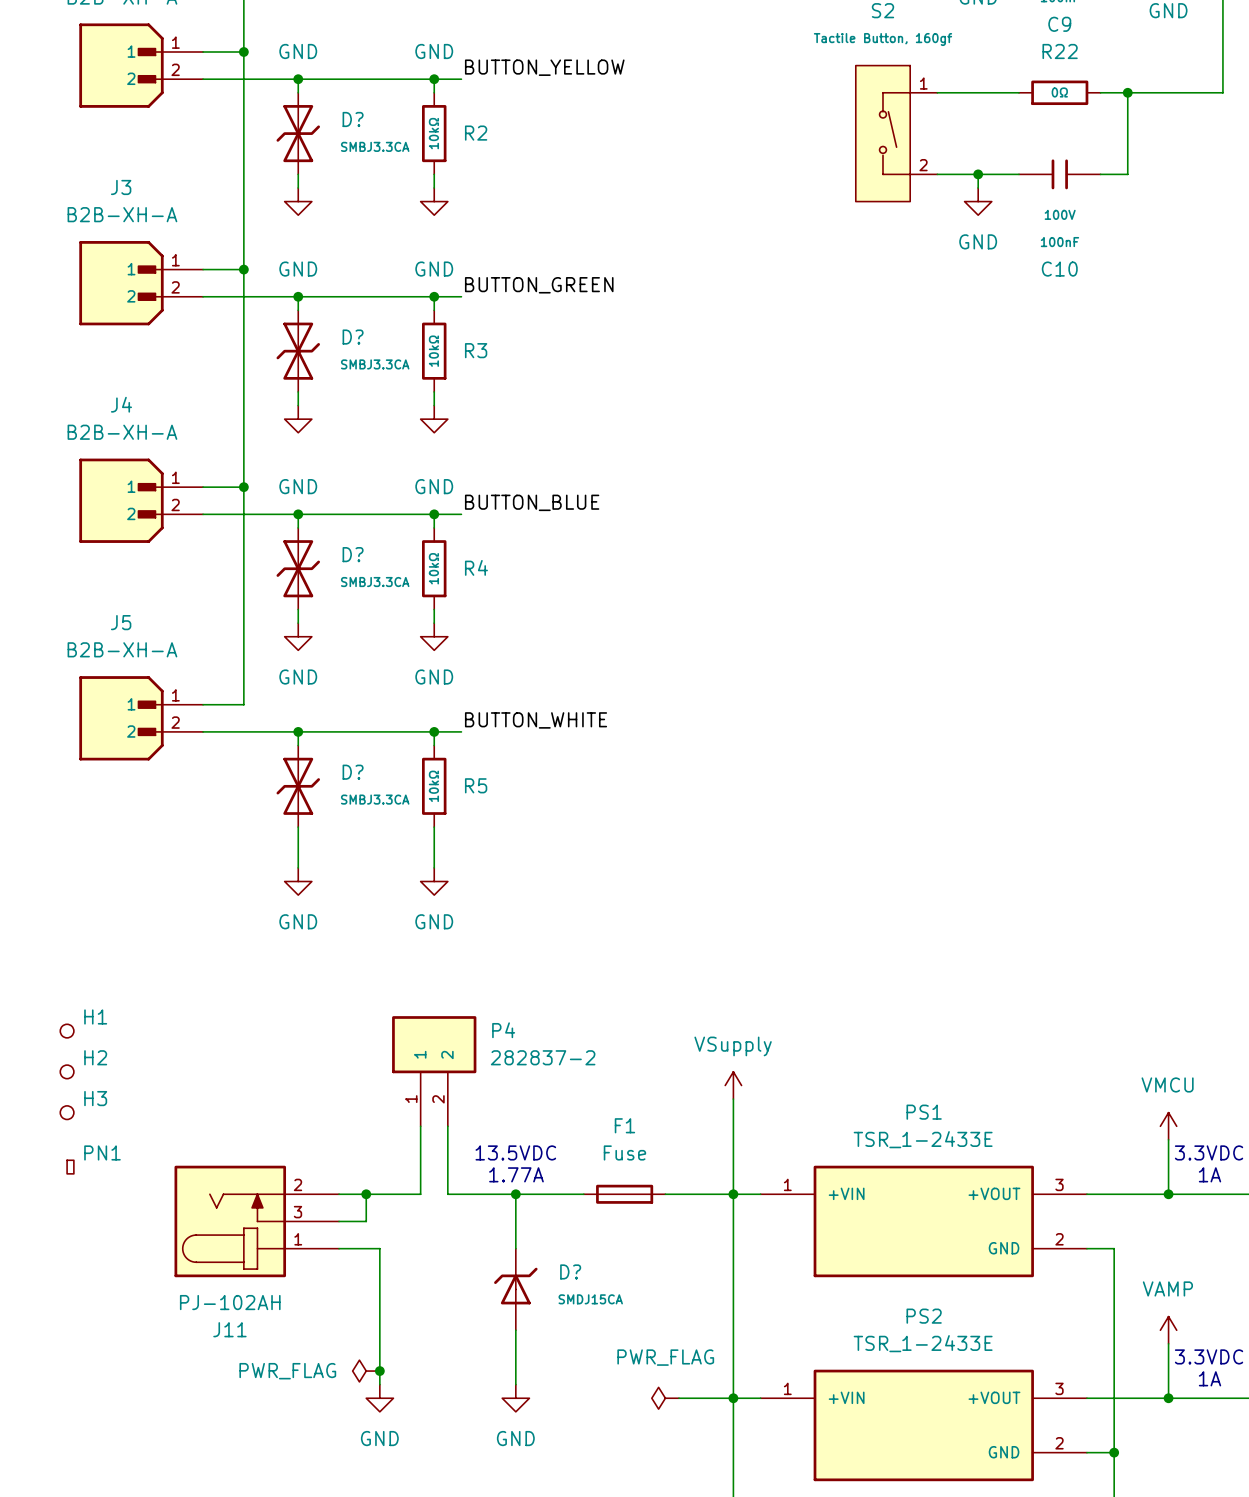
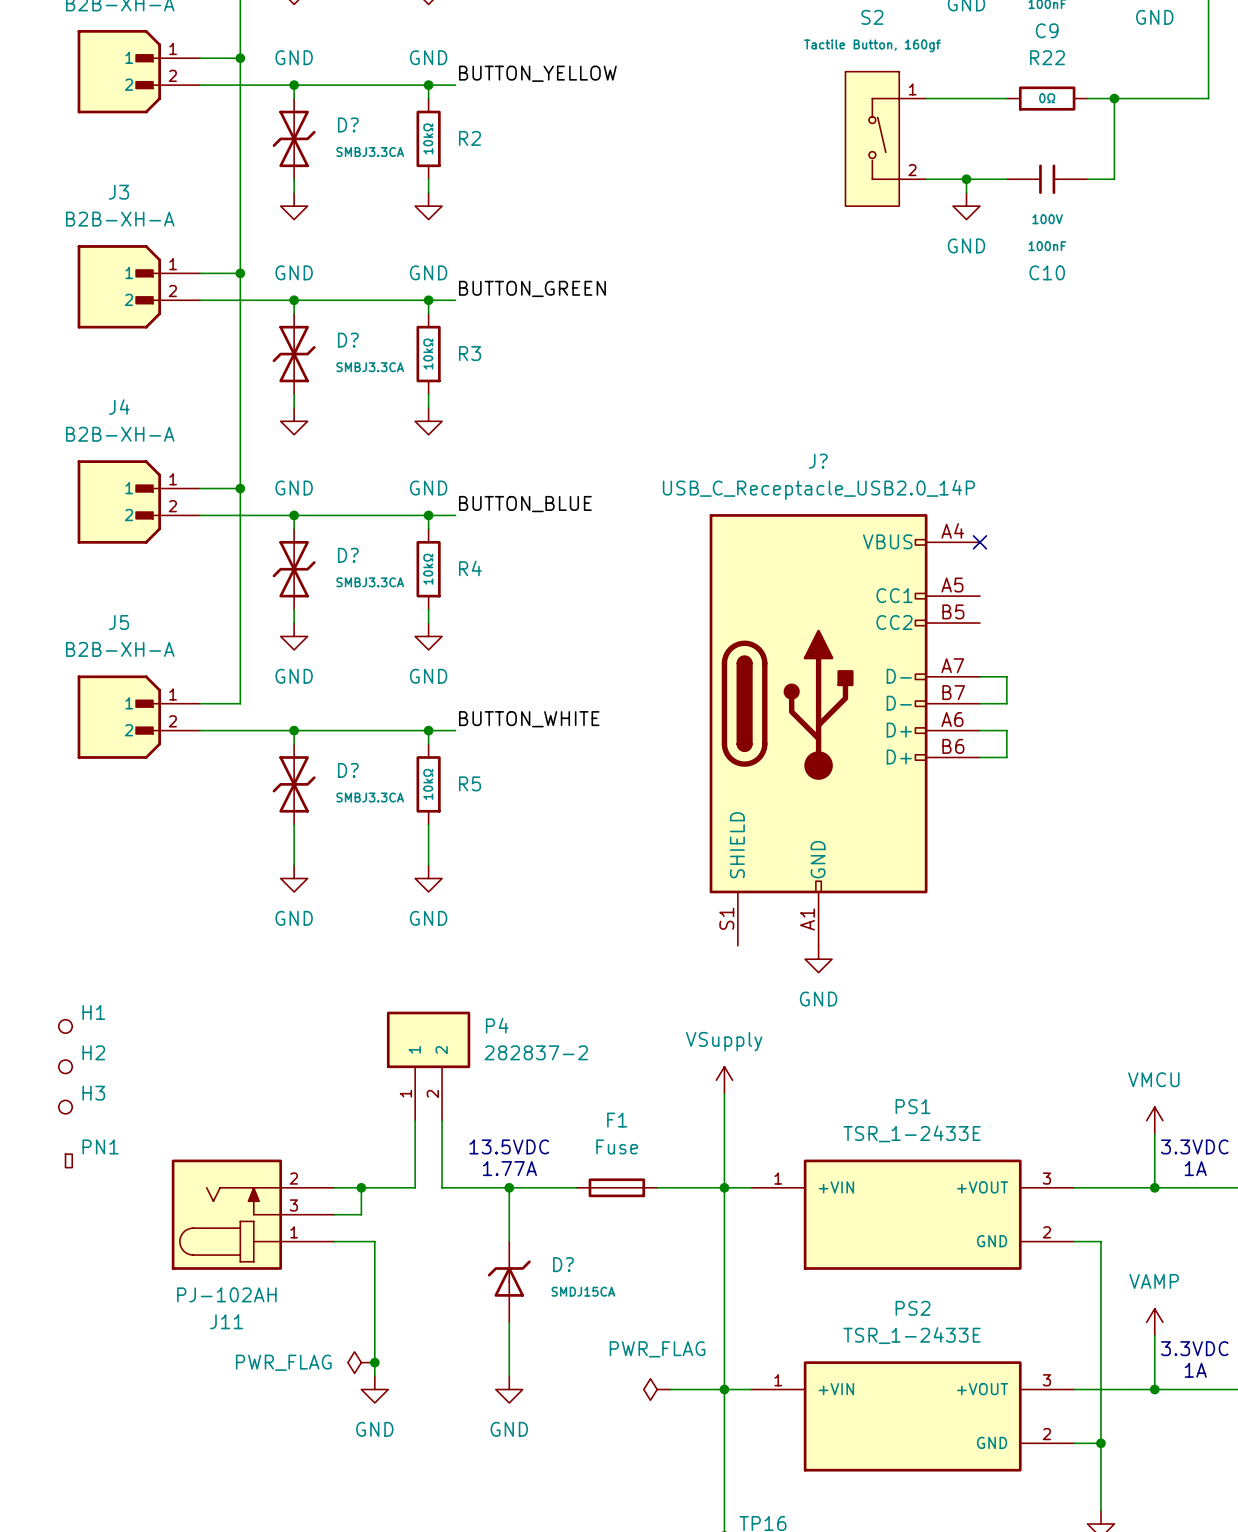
no-connect mark: none -> (979, 542)
wire: none -> (979, 676) (1006, 676) (1006, 703) (979, 703)
J?: none -> USB_C_Receptacle_USB2.0_14P (844, 729)
wire: none -> (979, 730) (1006, 730) (1006, 757) (979, 757)
power symbol: none -> GND (818, 959)

